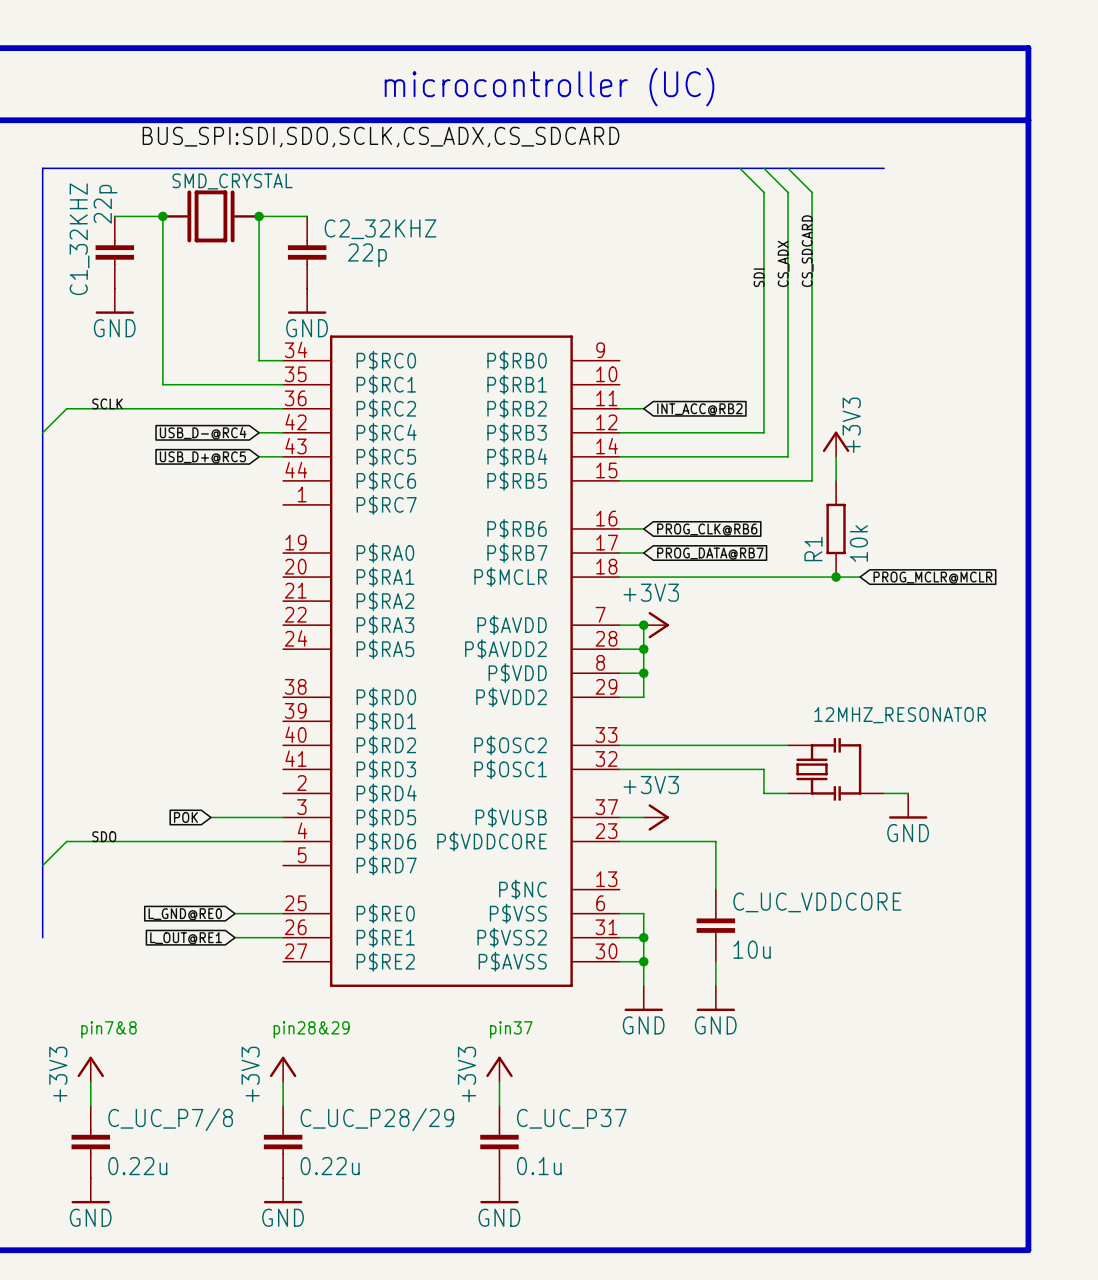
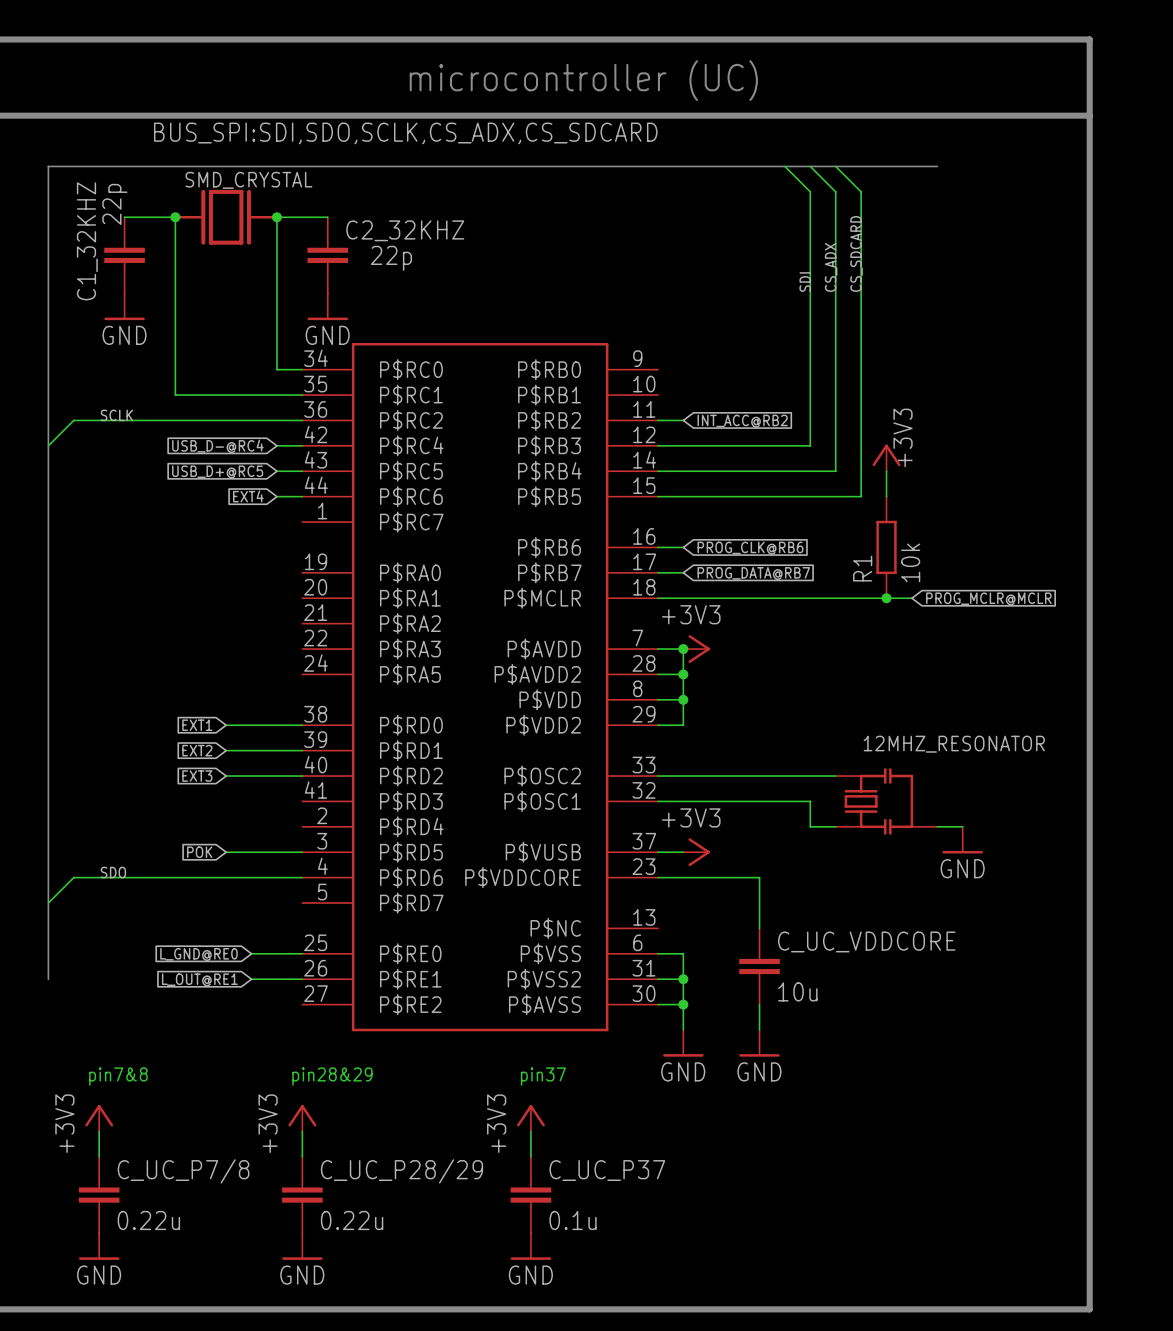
global label: none -> EXT4 (248, 496)
wire: none -> (276, 496) (302, 496)
global label: none -> EXT1 (197, 725)
wire: none -> (226, 725) (302, 725)
global label: none -> EXT2 (197, 750)
wire: none -> (226, 750) (302, 750)
global label: none -> EXT3 (197, 776)
wire: none -> (226, 776) (302, 776)

